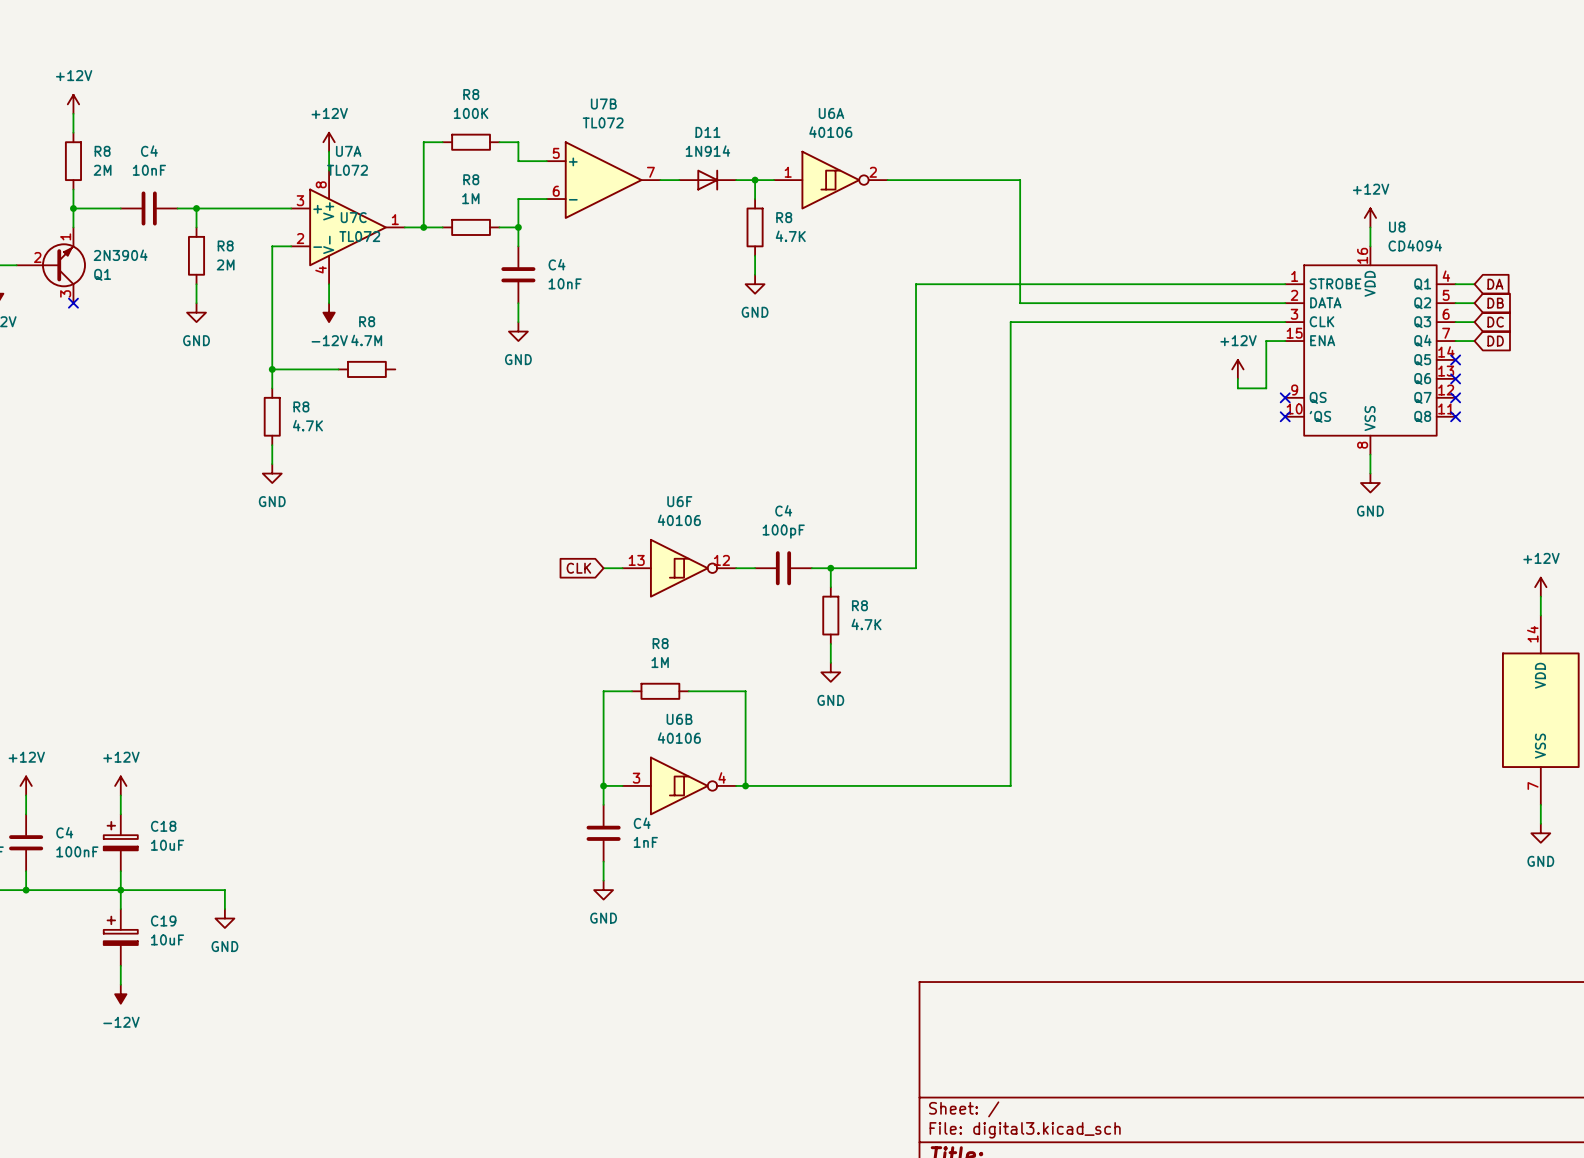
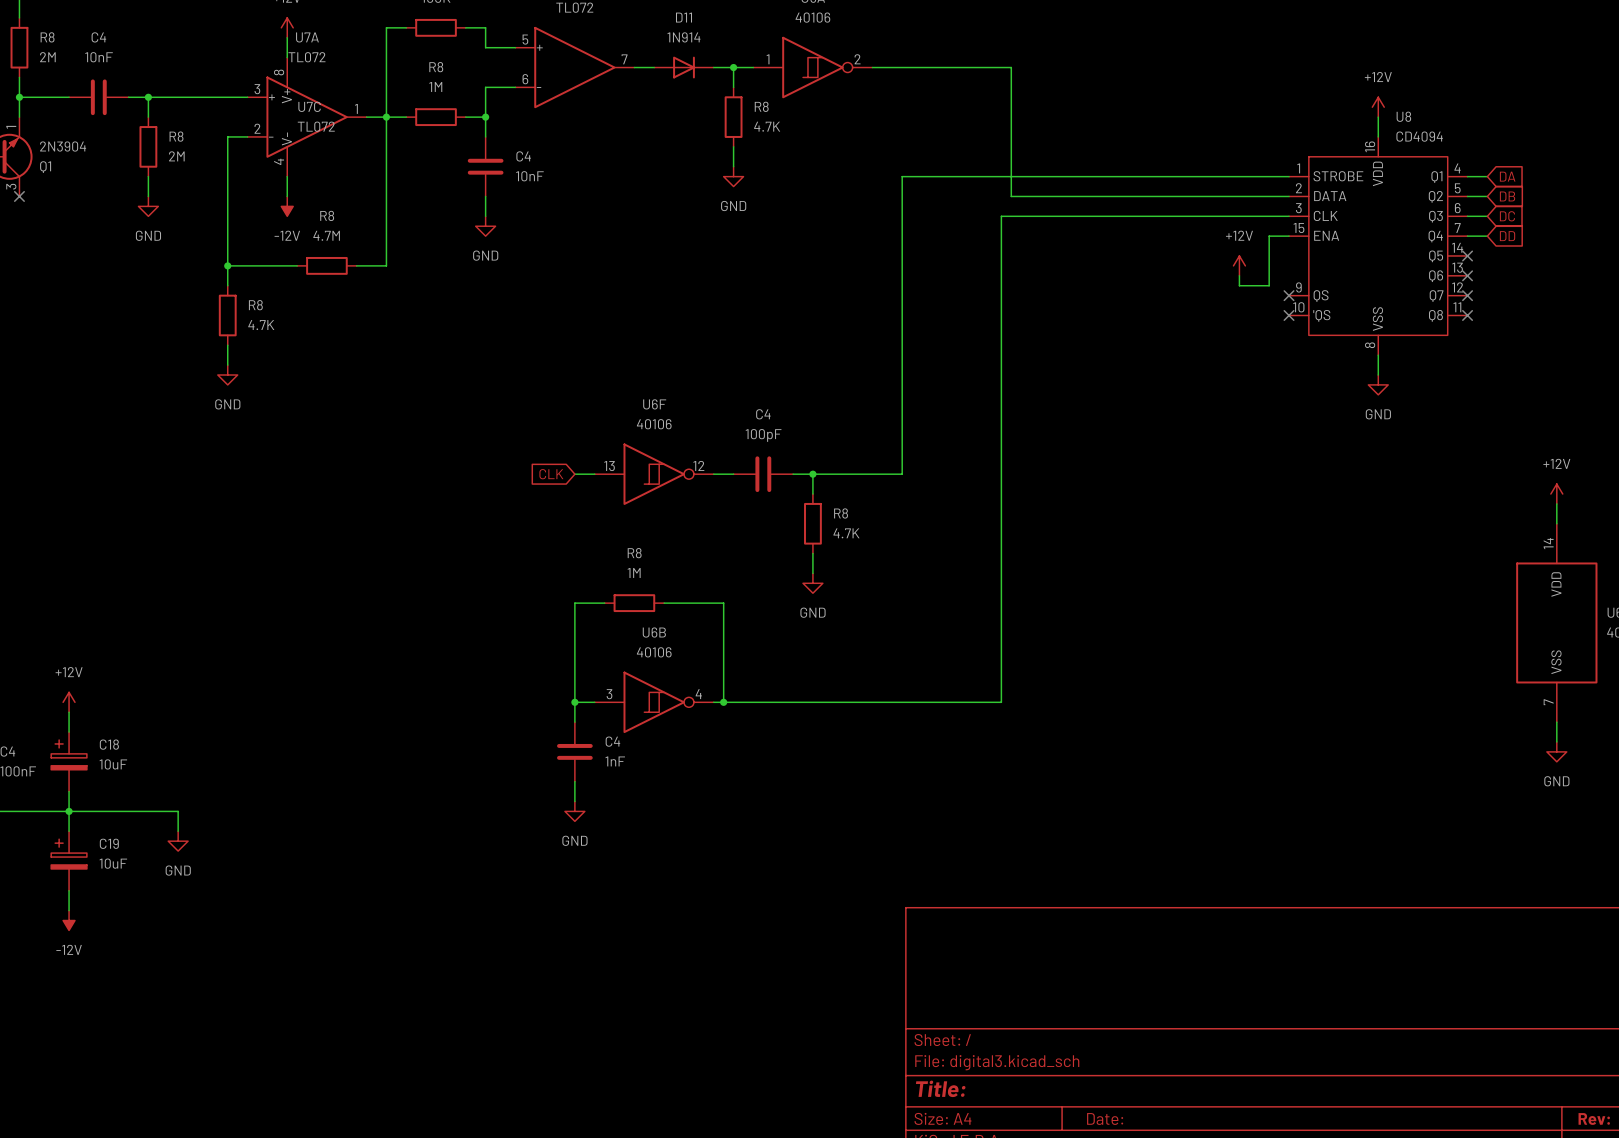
wire: none -> (386, 117) (386, 265) (356, 265)

